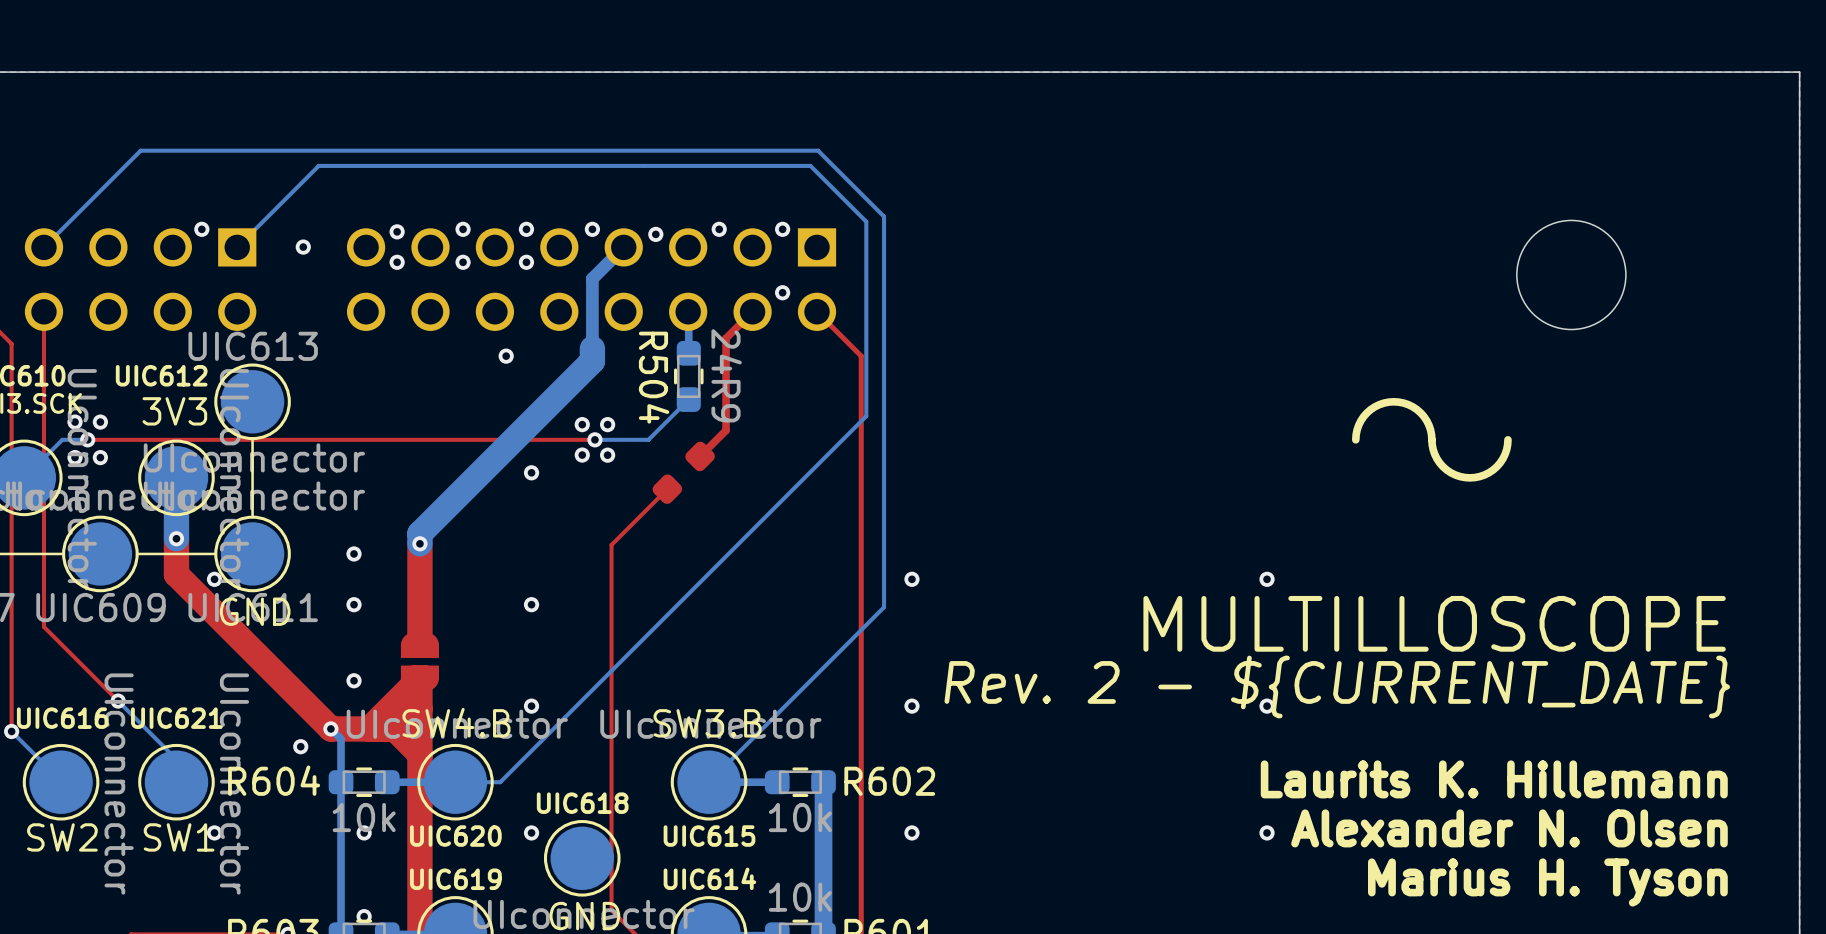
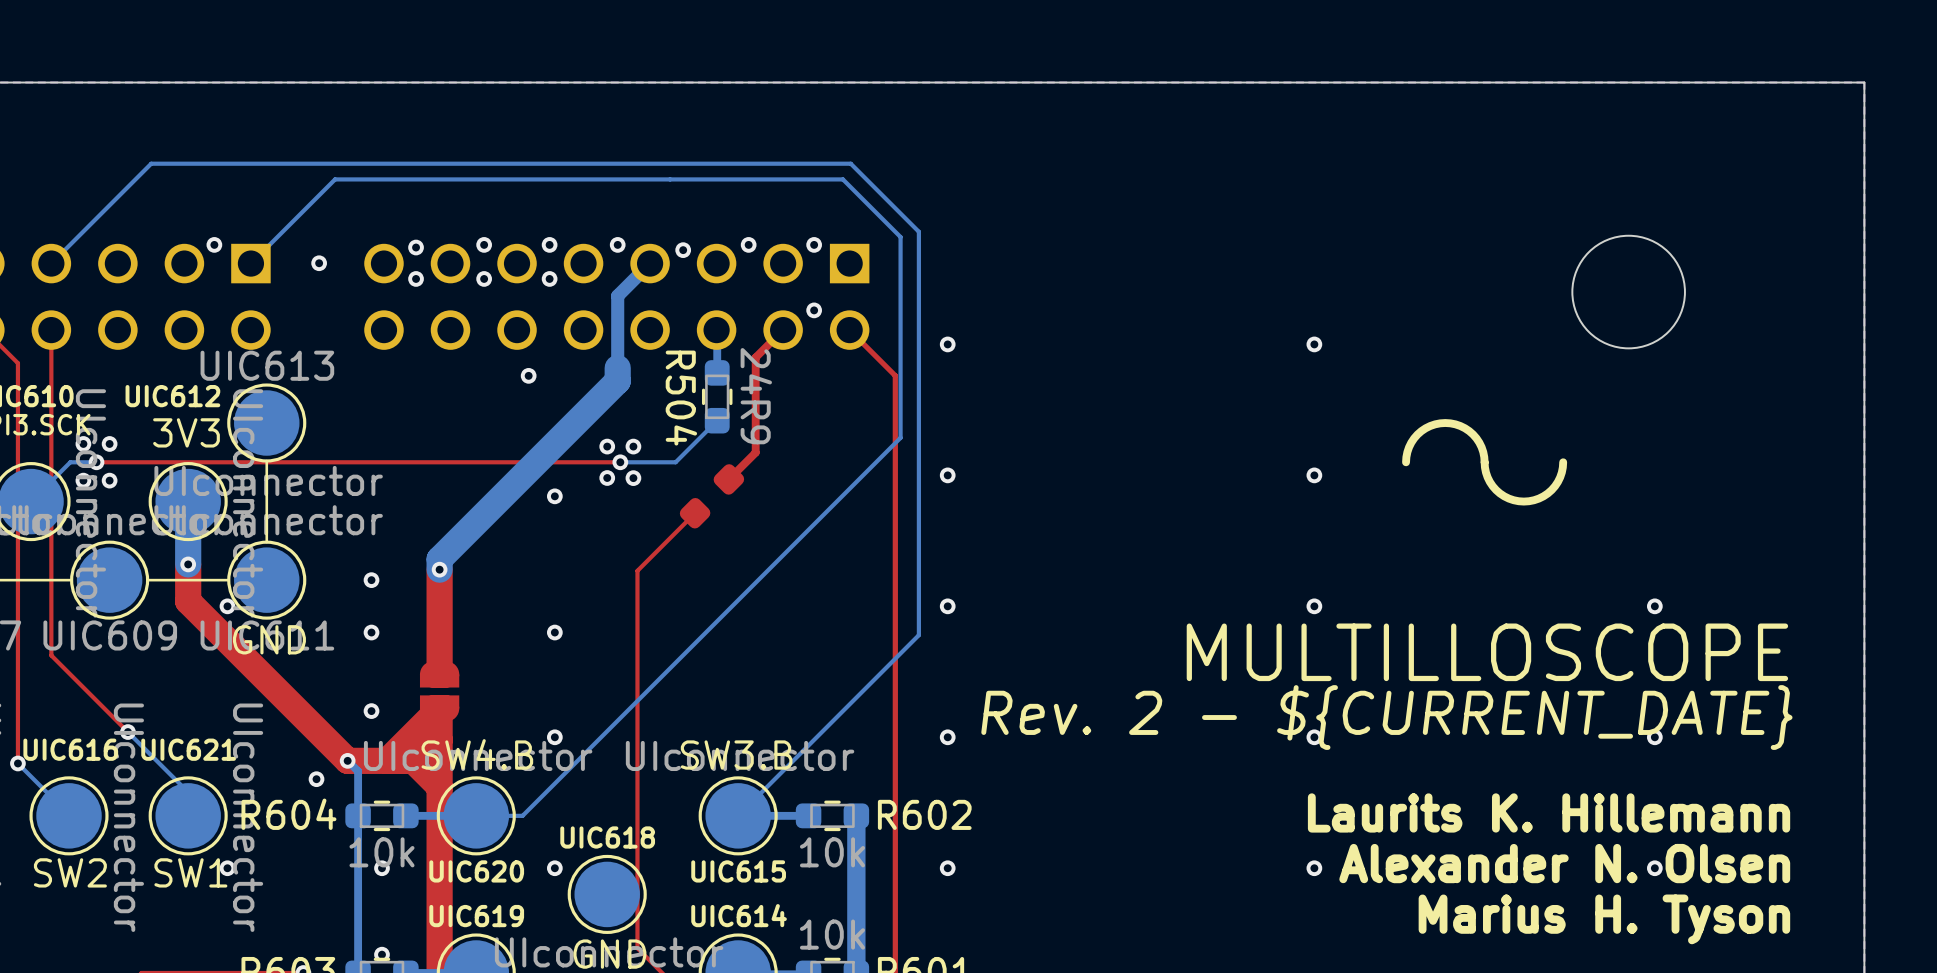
via: none -> (947, 344)
via: none -> (1314, 344)
via: none -> (947, 475)
via: none -> (1314, 475)
via: none -> (1654, 606)
via: none -> (1654, 737)
via: none -> (1654, 868)

